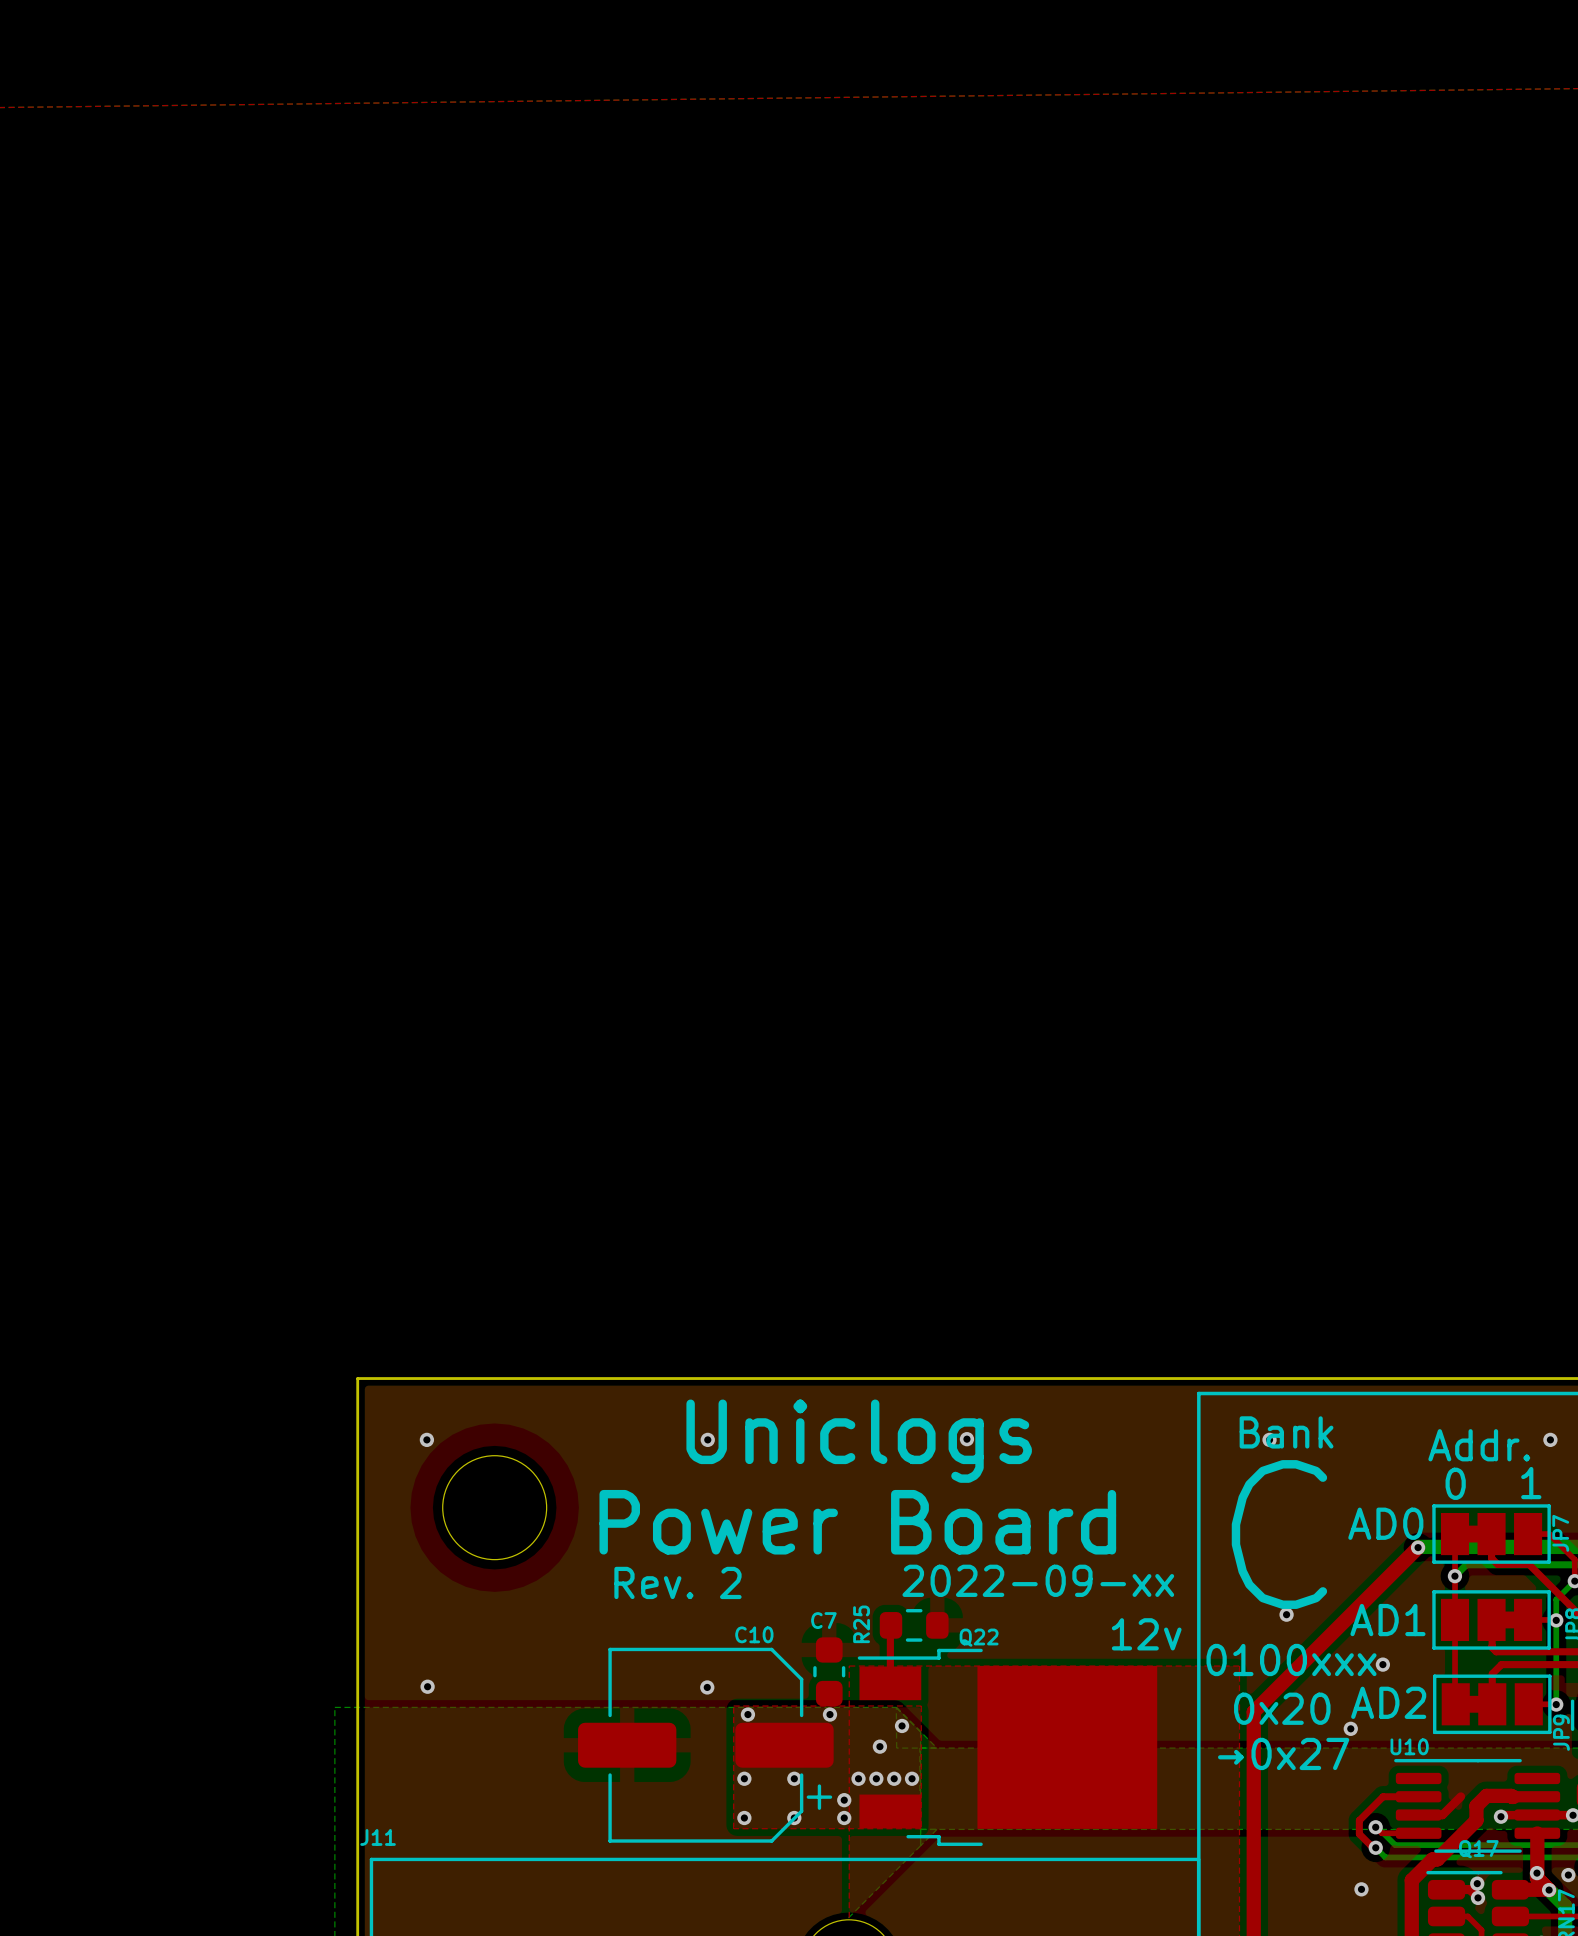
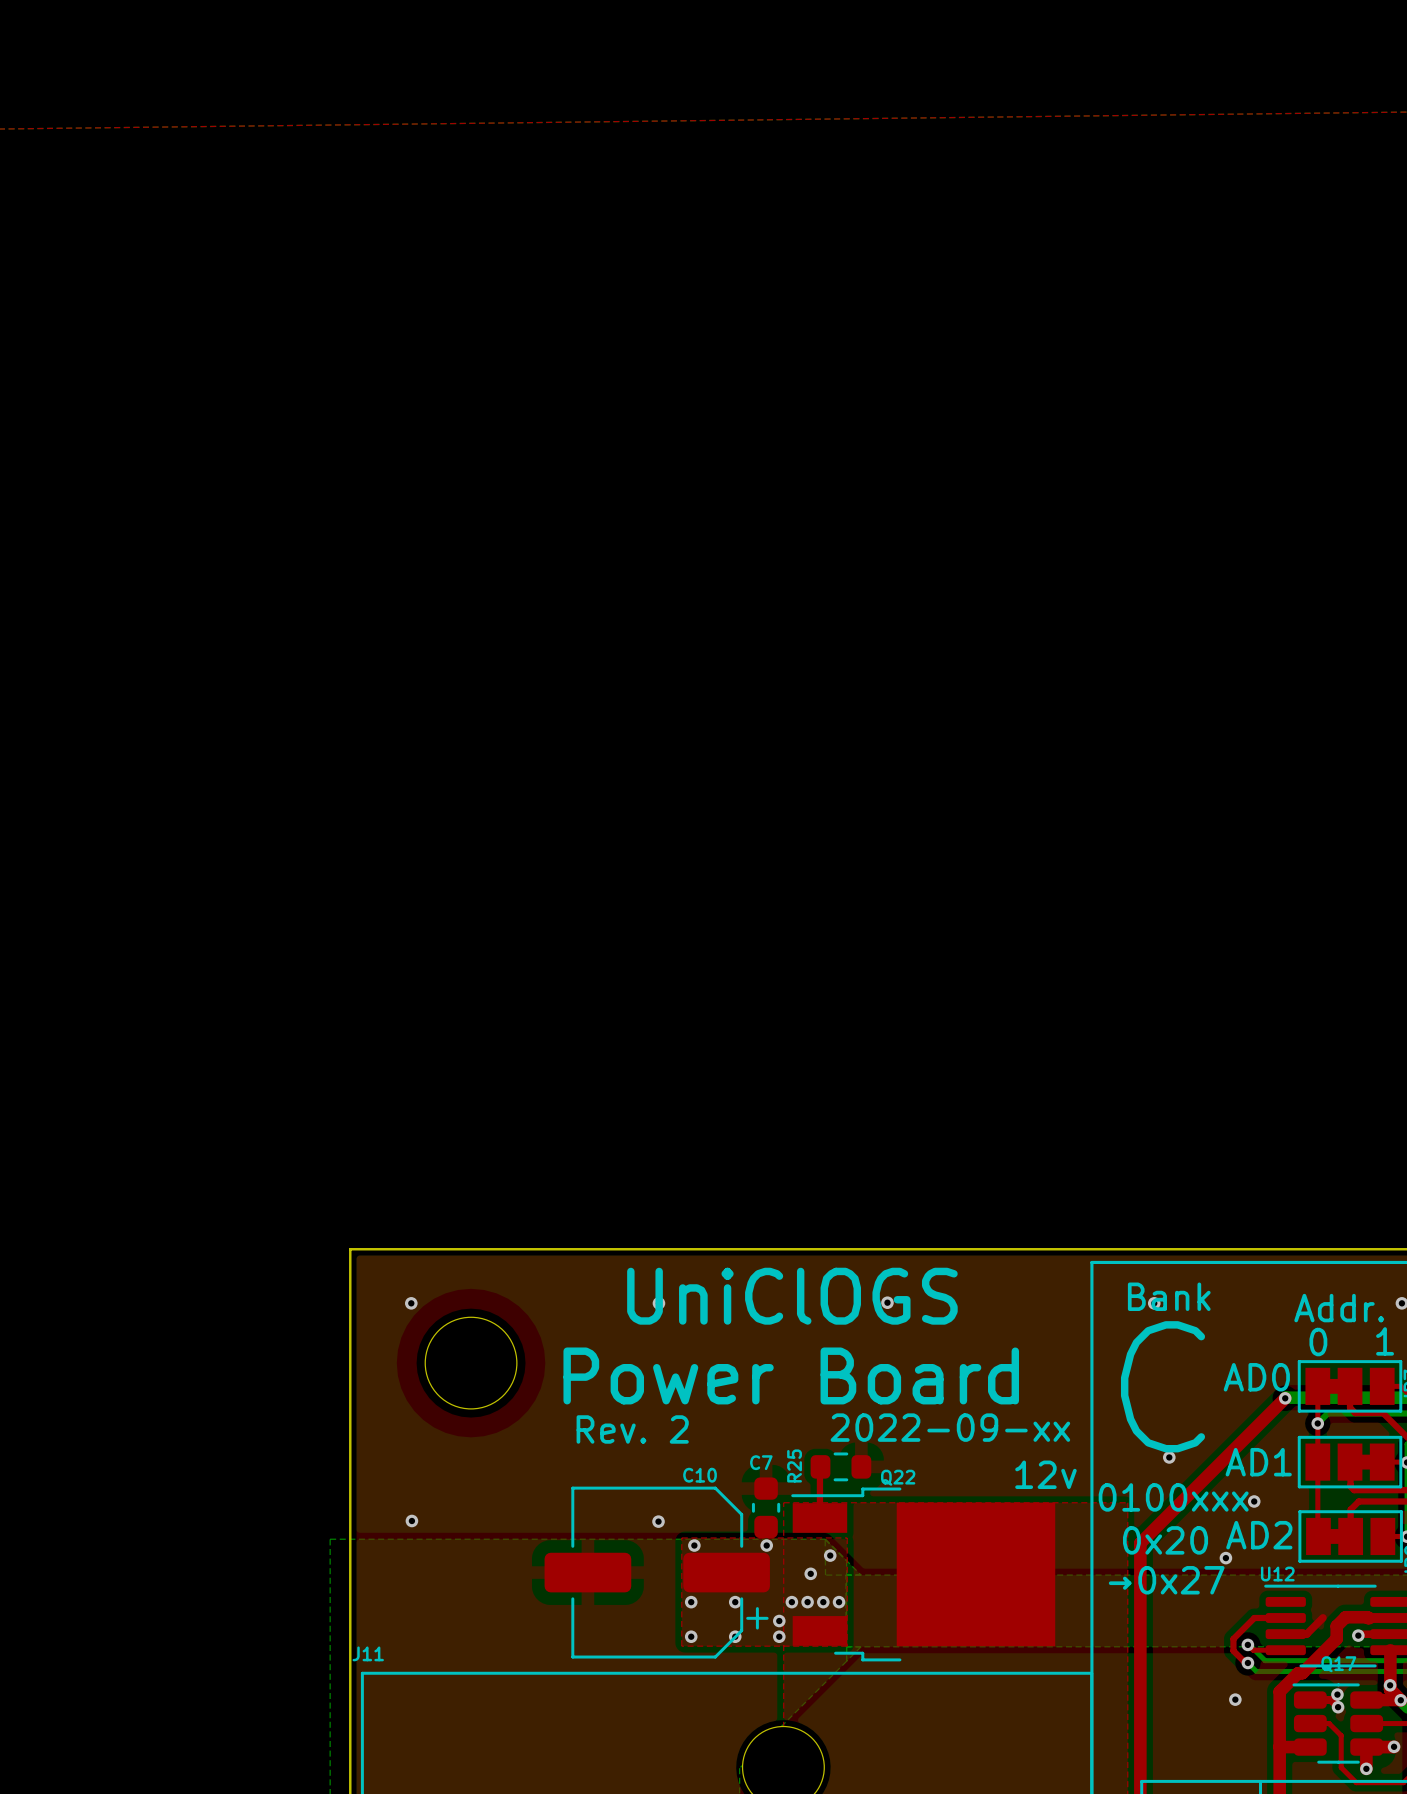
text: Uniclogs (859, 1441) -> UniClOGS (792, 1296)
U10 name: U10 (1409, 1746) -> U12 (1277, 1573)

